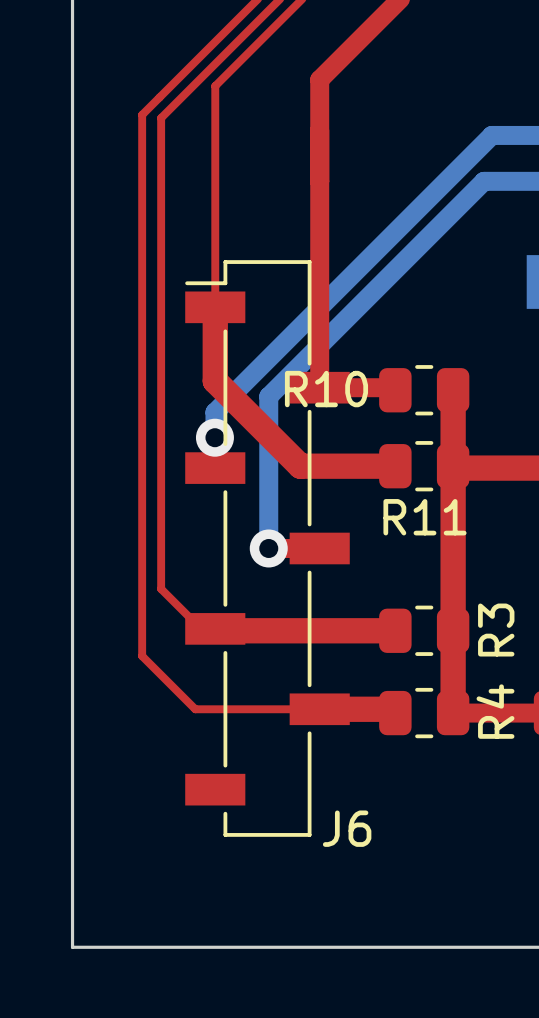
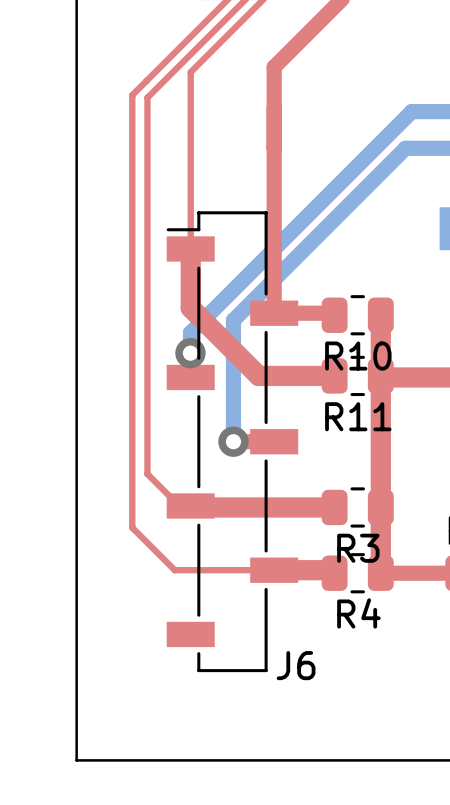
R10 name position: R10 (326, 389) -> R10 (358, 356)
R3 name rotation: 0° (496, 630) -> 90° clockwise (358, 548)
R3 name position: R3 (496, 630) -> R3 (358, 548)
R4 name rotation: 0° (495, 711) -> 90° clockwise (358, 613)
R4 name position: R4 (495, 711) -> R4 (358, 613)

